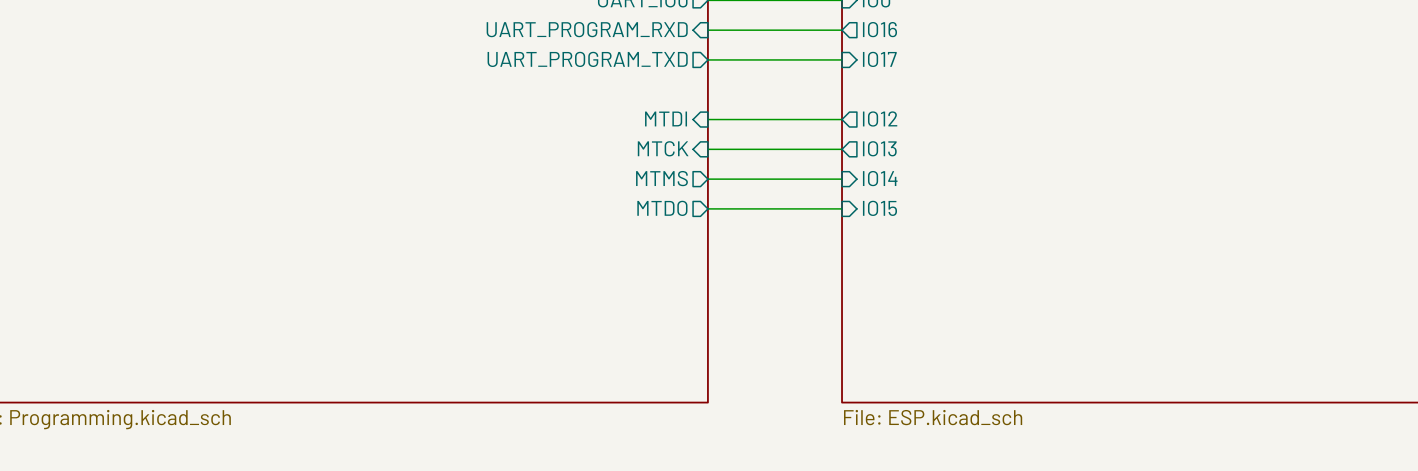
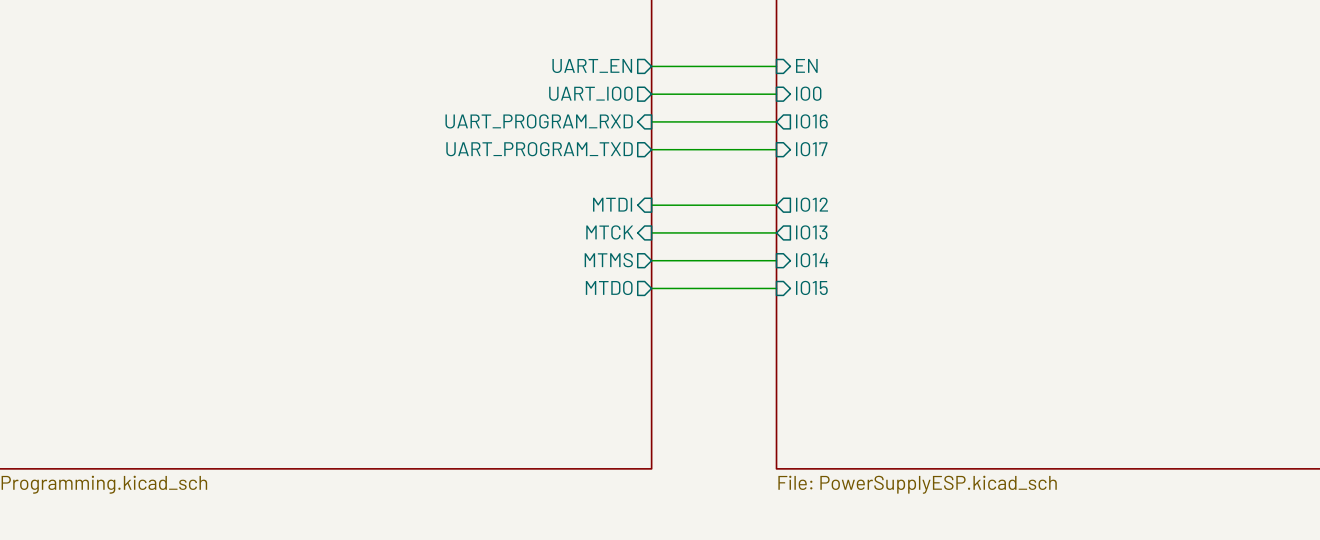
sheet value: File: ESP.kicad_sch (933, 417) -> File: PowerSupplyESP.kicad_sch (917, 484)

